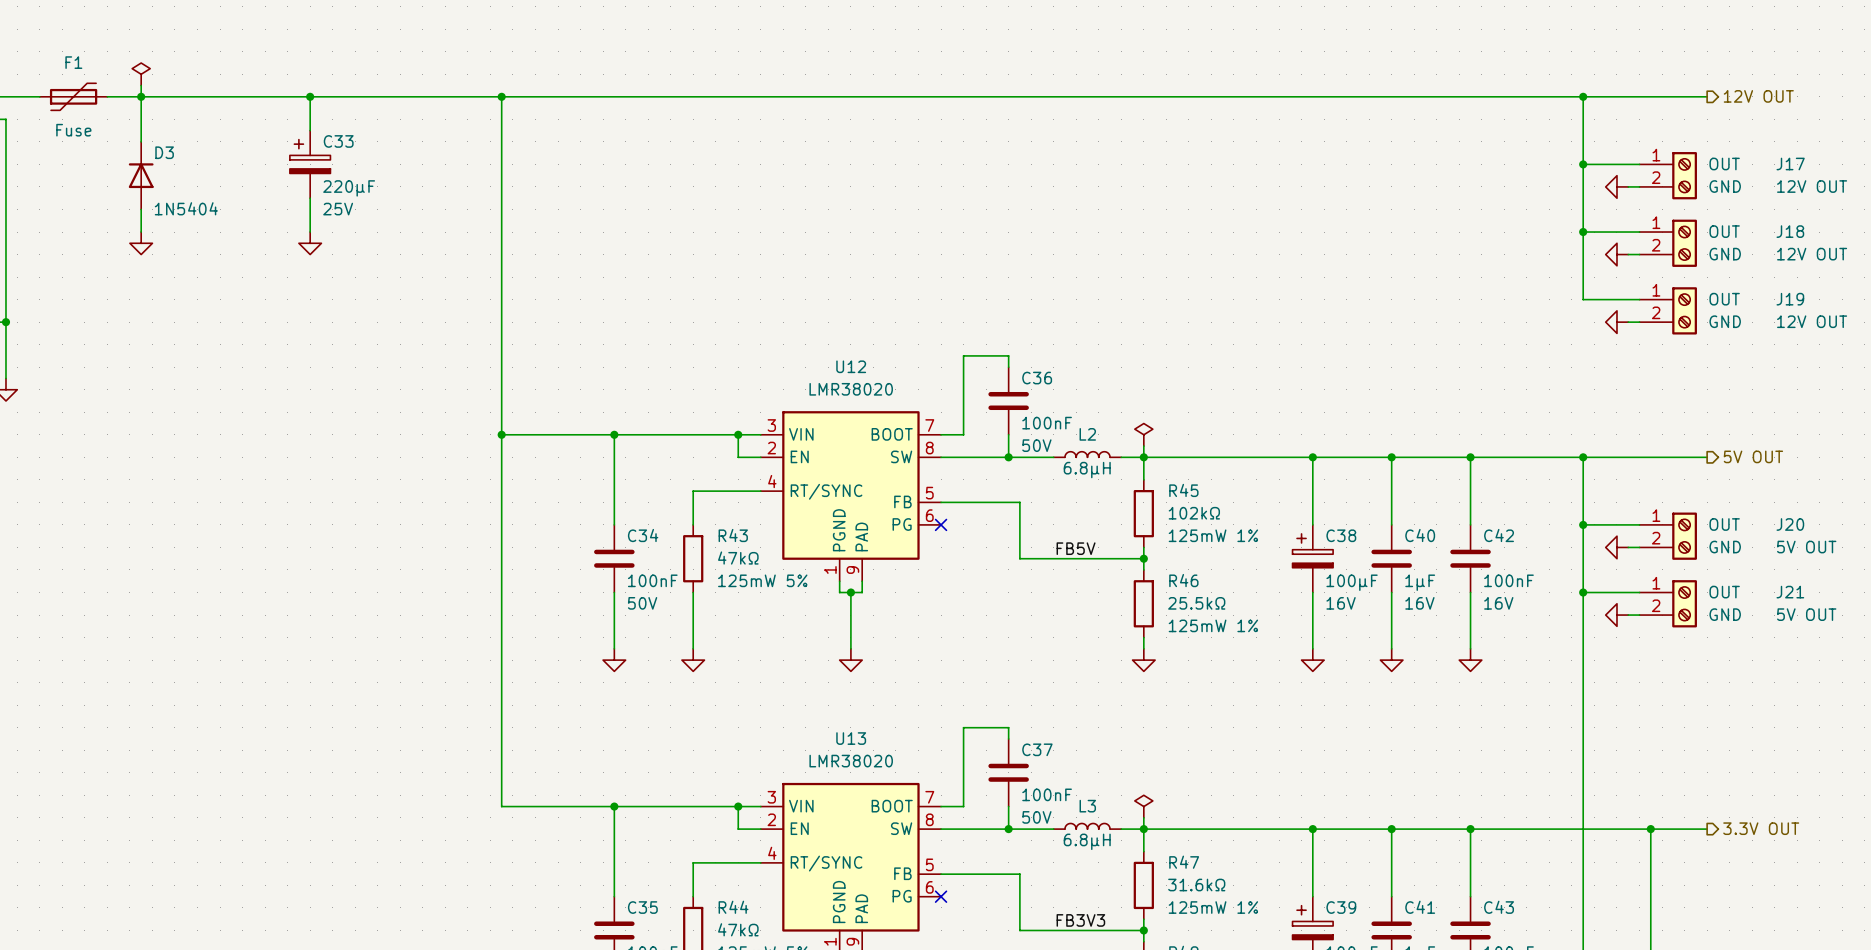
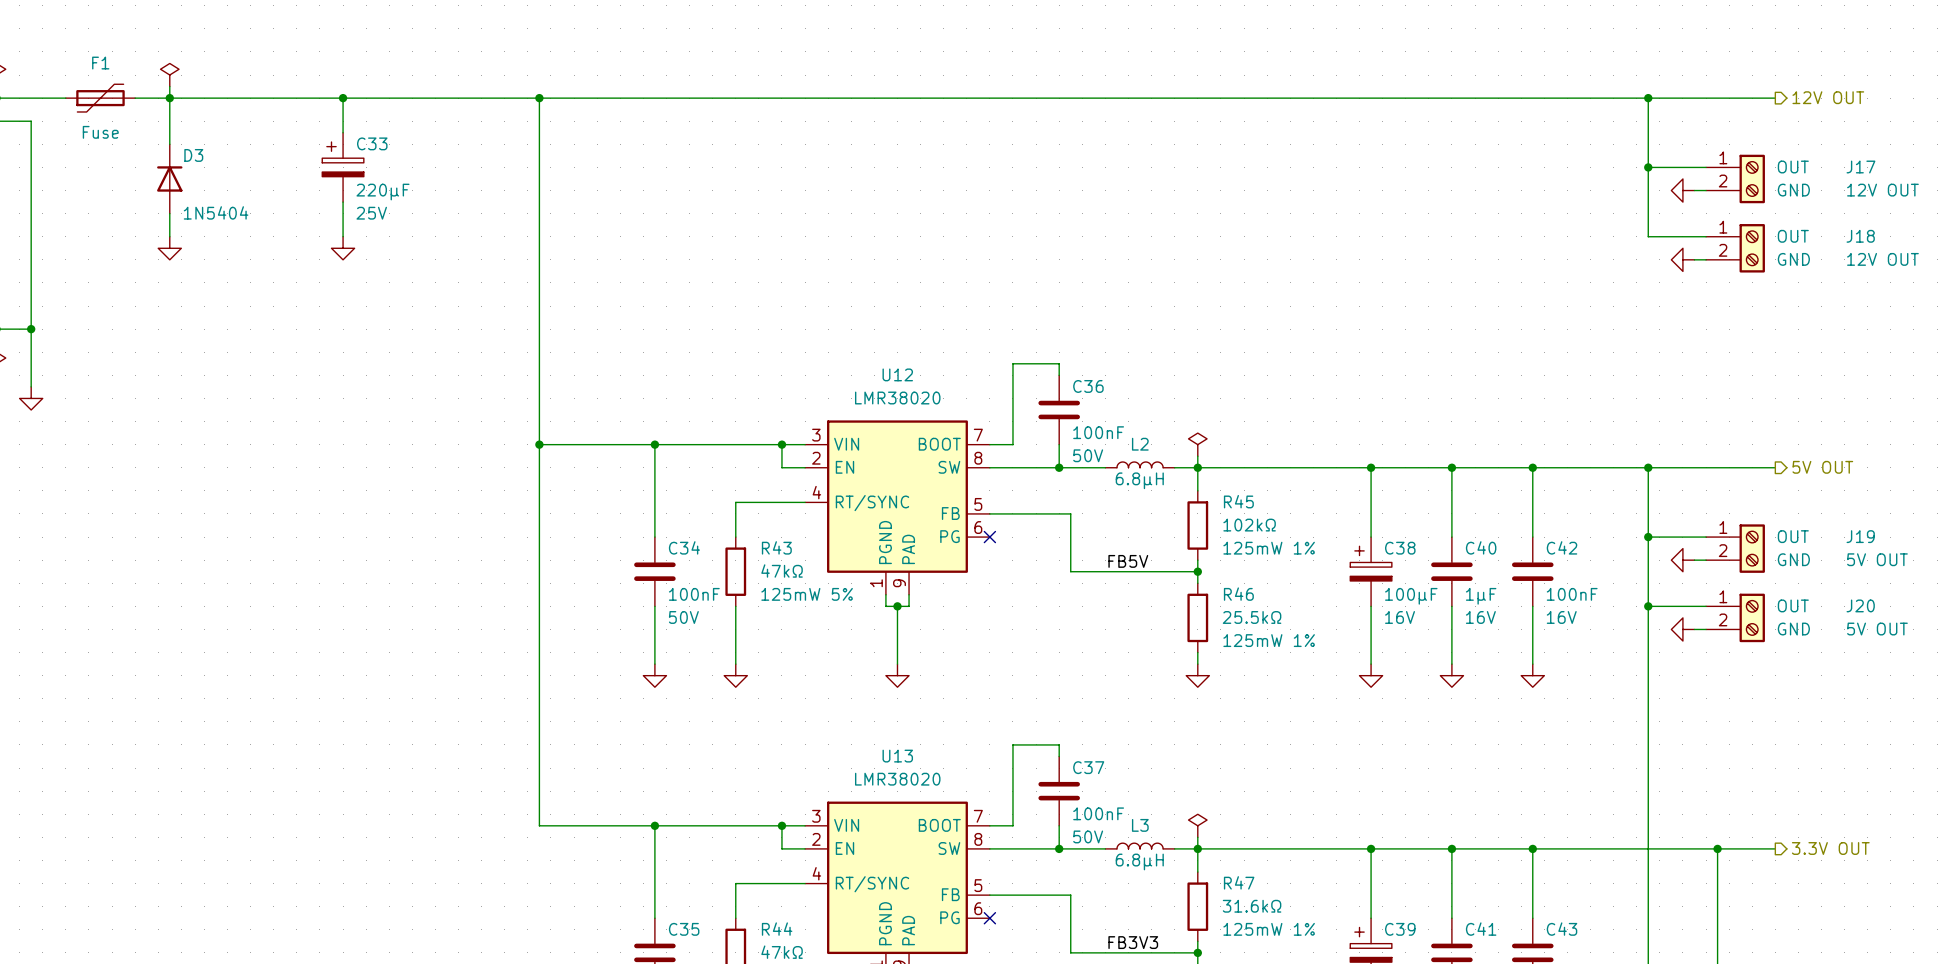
wire: (1583, 232) (1583, 299) (1639, 299) -> none
junction: (1583, 232) -> none
J19: (1668, 310) -> none
power symbol: (1616, 322) -> none
wire: (1628, 322) (1639, 322) -> none
J20 name: J20 (1790, 524) -> J19 (1860, 536)
J21 name: J21 (1790, 592) -> J20 (1860, 605)

